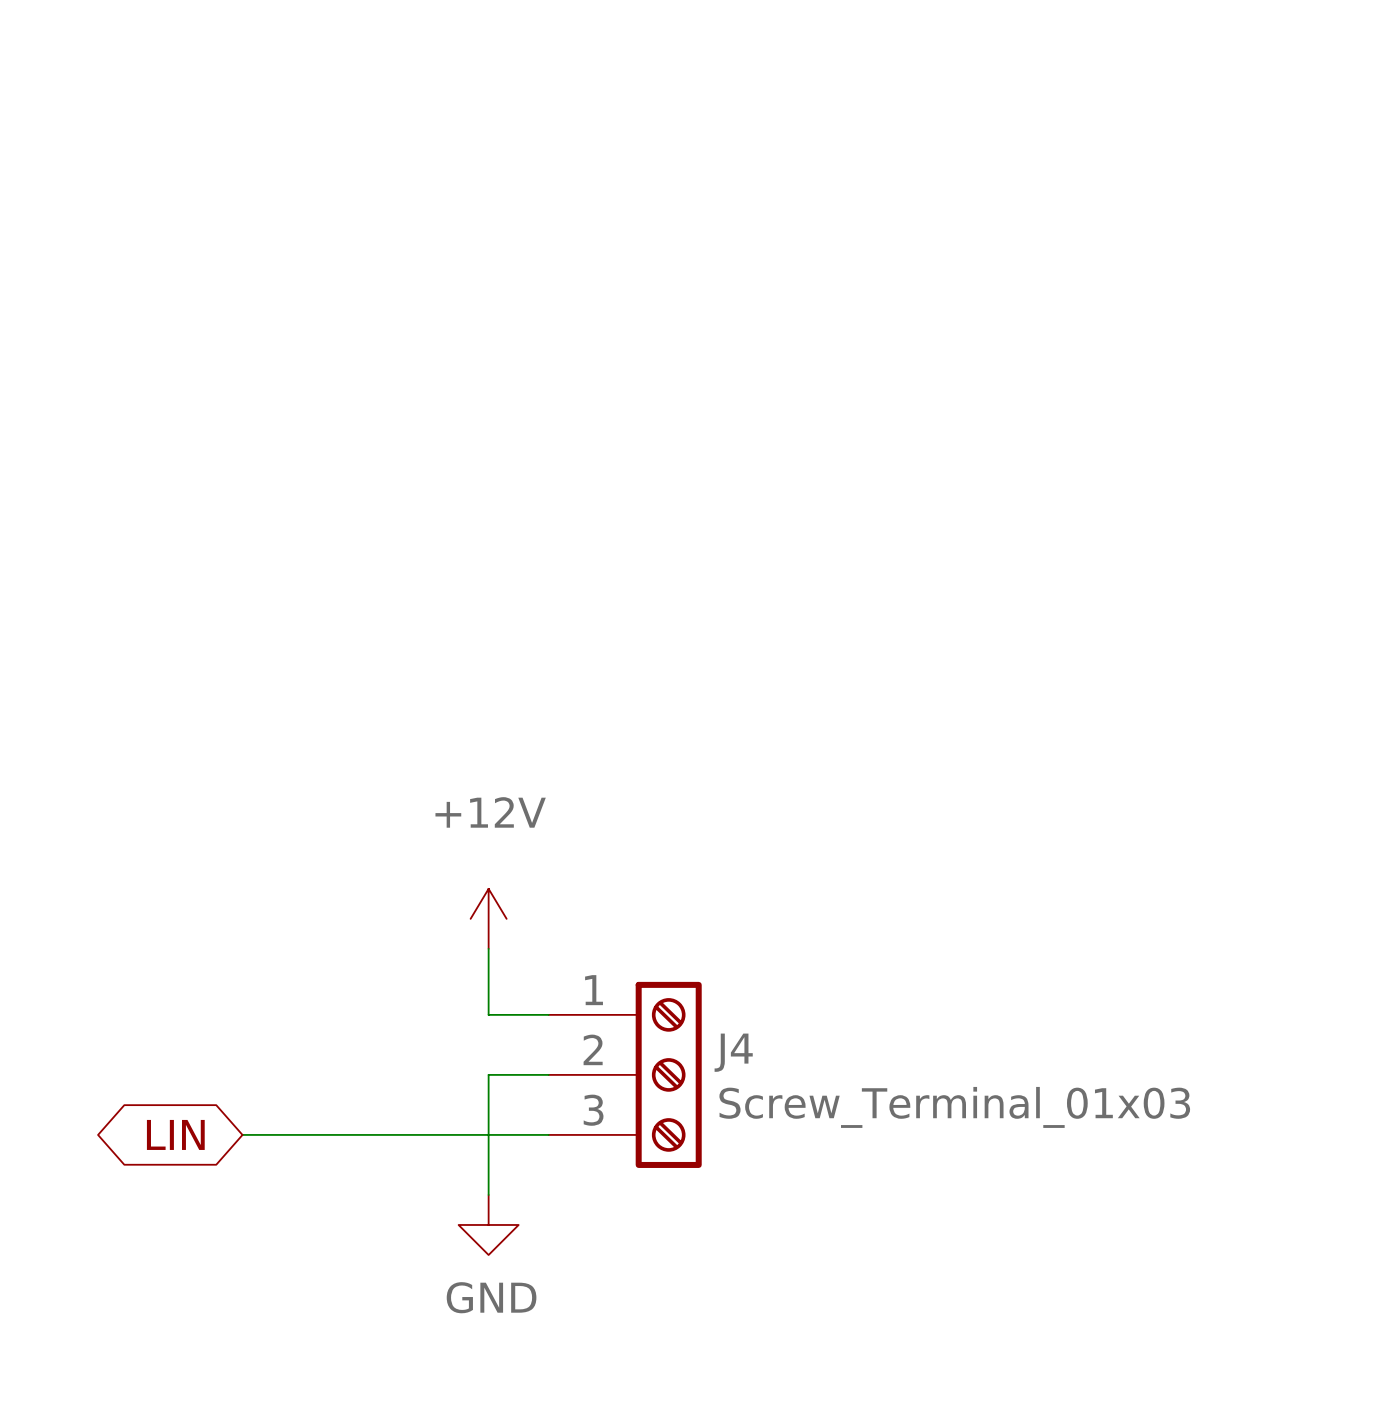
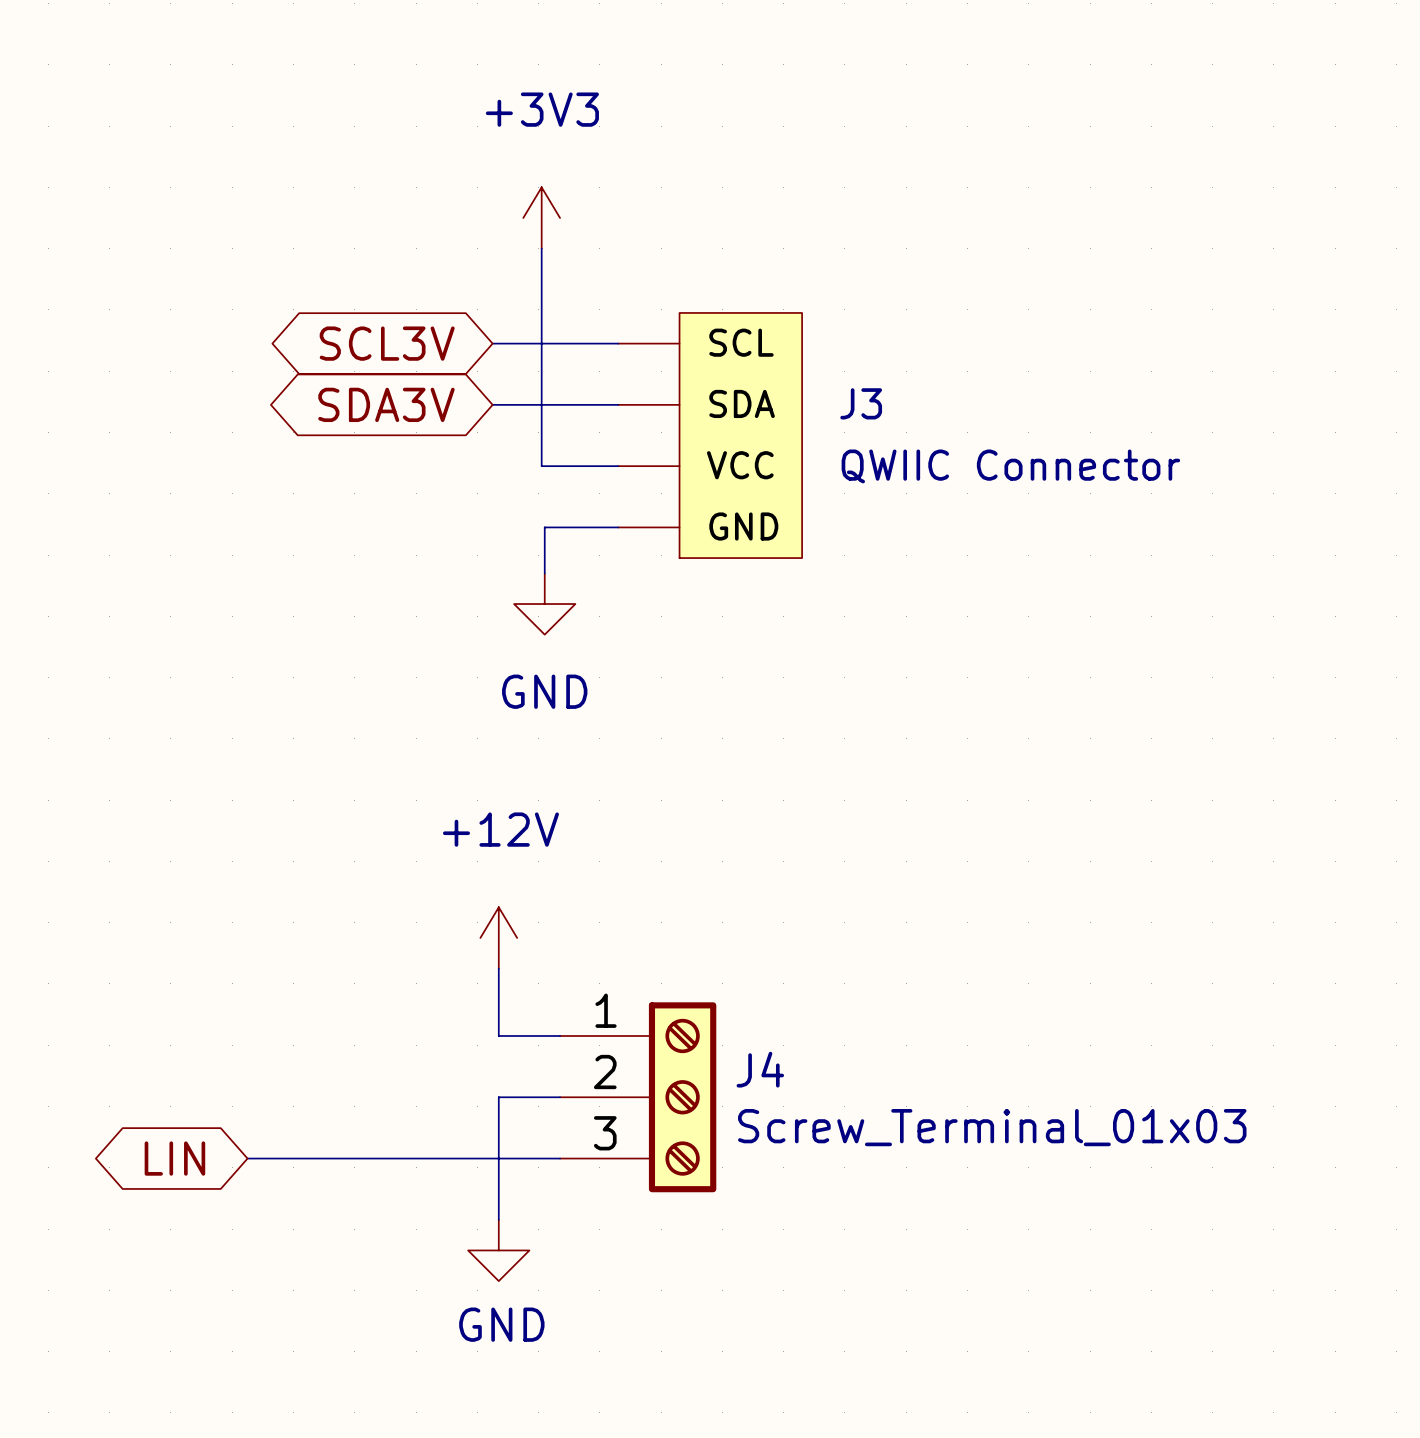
power symbol: none -> +3V3 (541, 217)
wire: none -> (541, 248) (541, 466) (618, 466)
global label: none -> SCL3V (387, 343)
wire: none -> (492, 343) (618, 343)
global label: none -> SDA3V (386, 404)
wire: none -> (492, 404) (618, 404)
J3: none -> QWIIC Connector (710, 435)
wire: none -> (618, 527) (544, 527) (544, 573)
power symbol: none -> GND (544, 604)

